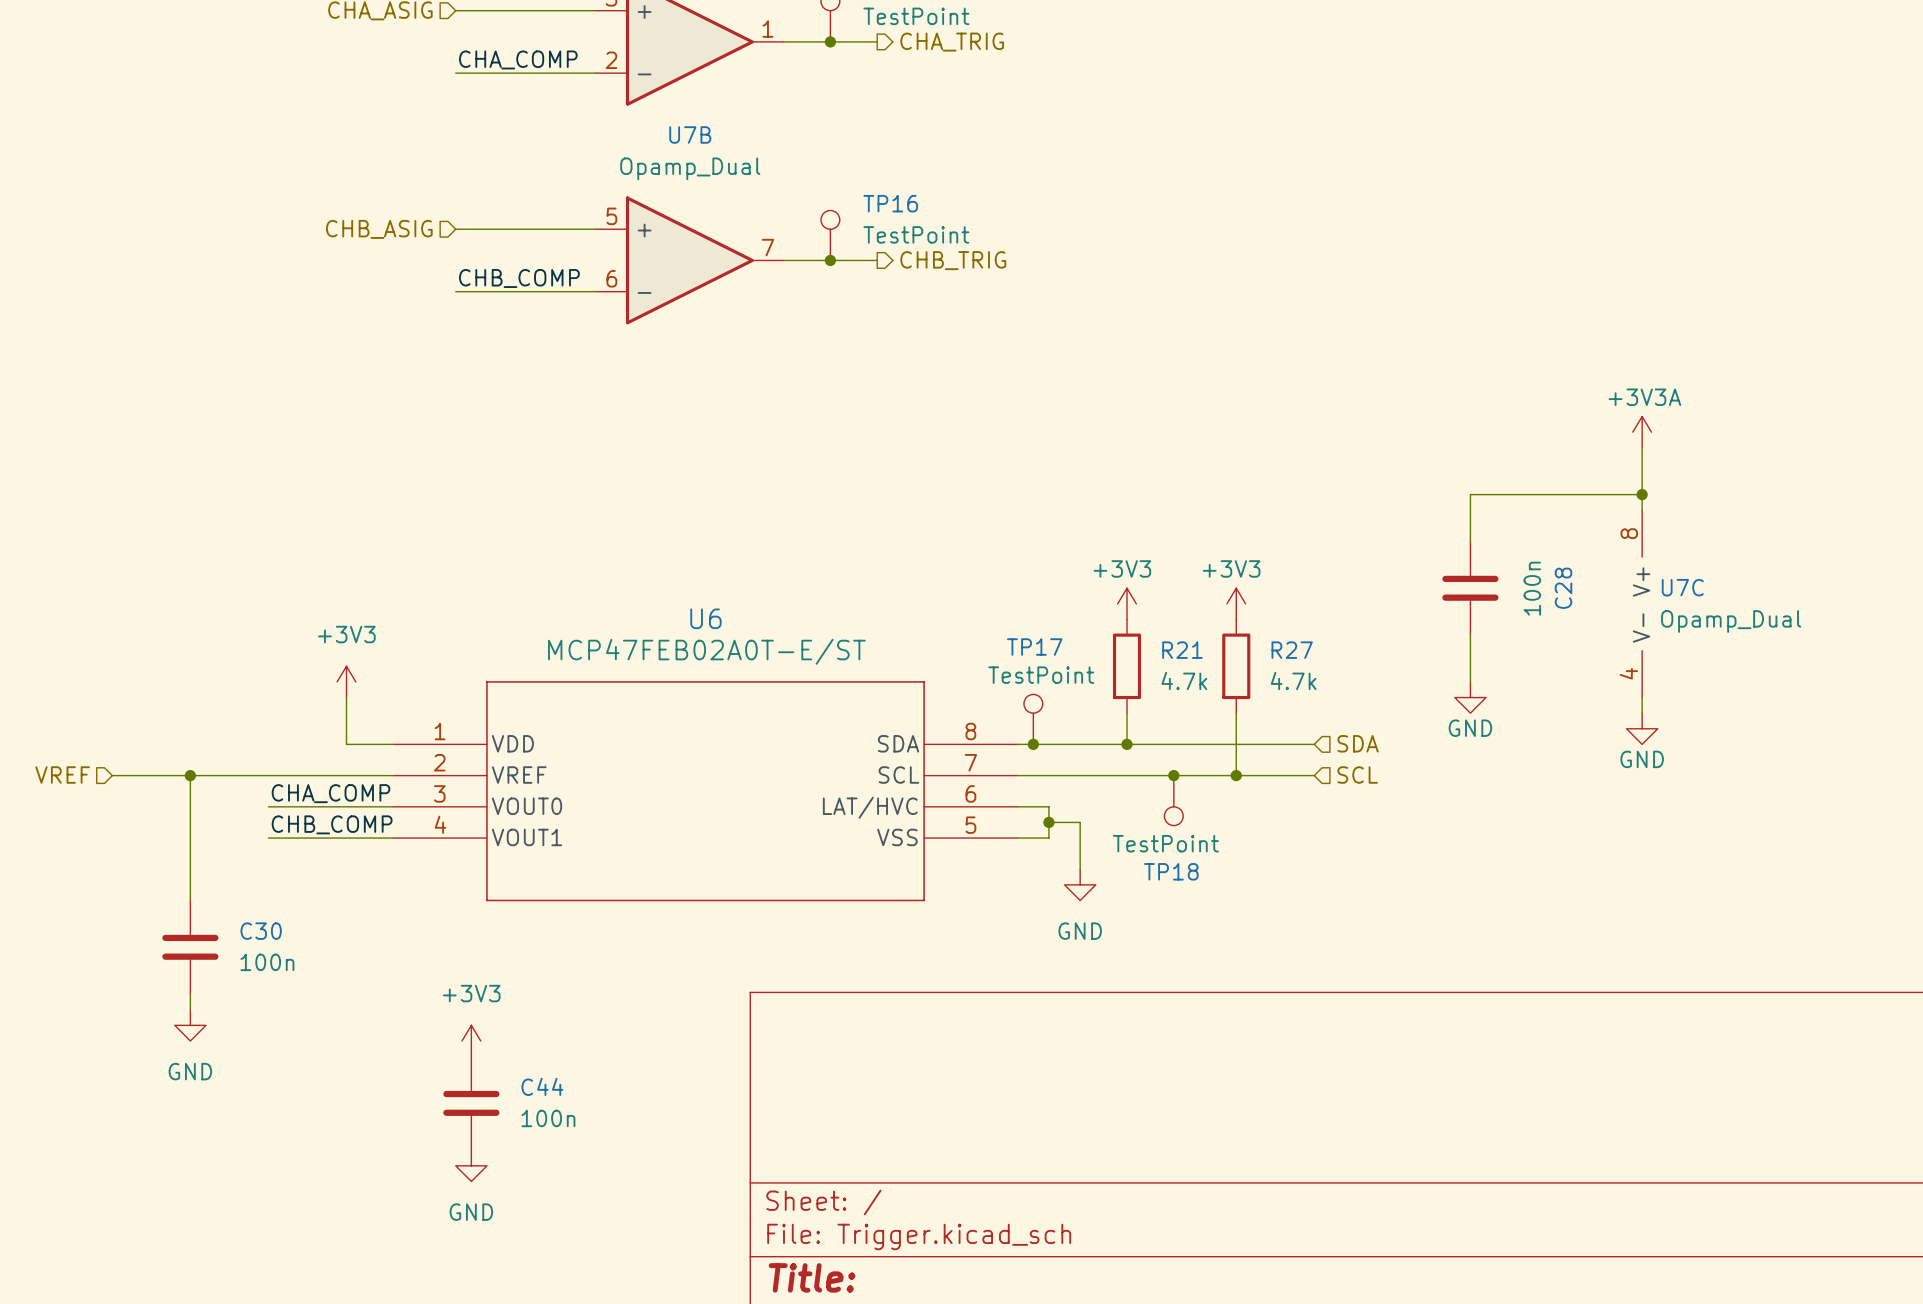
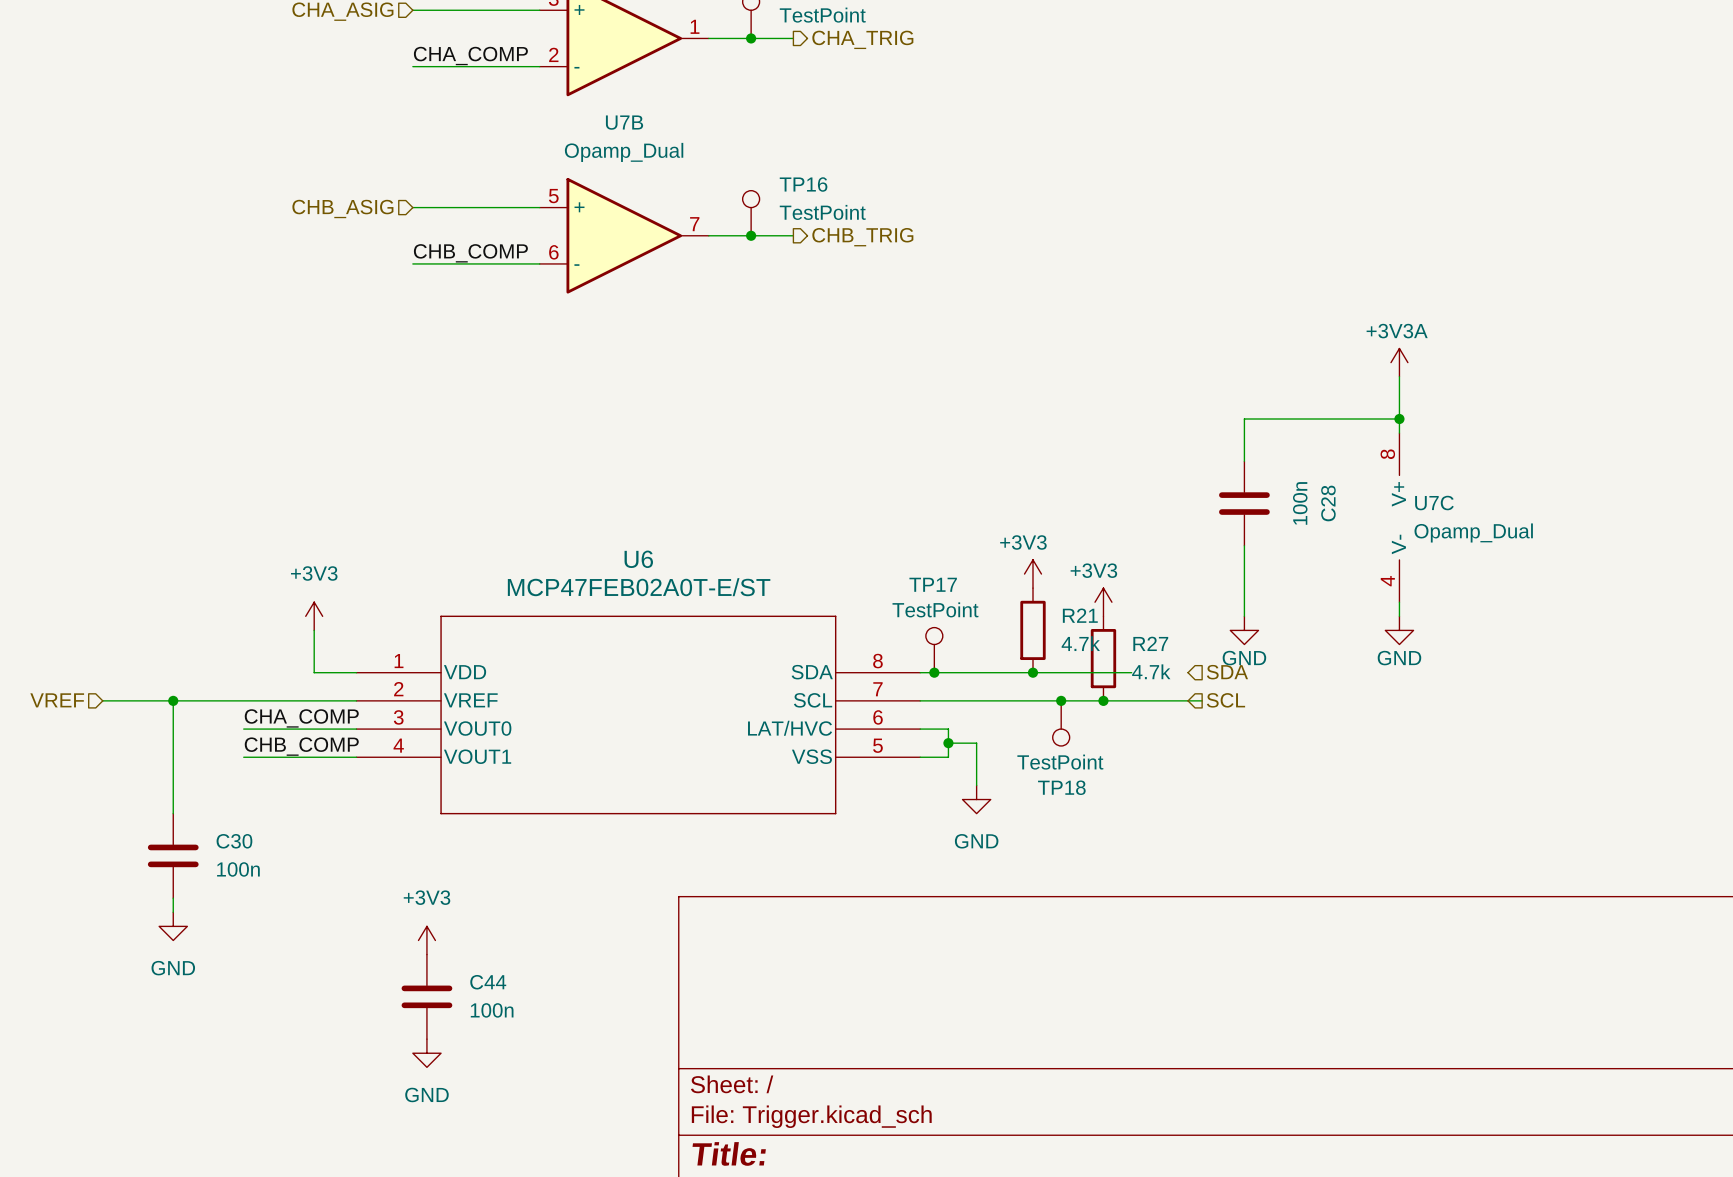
power symbol position: +3V3A (1642, 432) -> +3V3A (1399, 362)
wire: (1642, 447) (1642, 510) -> (1399, 376) (1399, 433)
junction: none -> (1399, 418)
wire: (1642, 494) (1470, 494) (1470, 541) -> (1399, 418) (1244, 418) (1244, 461)
junction: (1642, 494) -> none
C28 position: (1470, 588) -> (1244, 503)
power symbol position: +3V3 (1127, 603) -> +3V3 (1033, 574)
power symbol: +3V3 (1236, 603) -> none
wire: none -> (1244, 545) (1244, 616)
U7C position: (1642, 603) -> (1399, 517)
wire: (1470, 635) (1470, 681) -> none
R21 position: (1127, 666) -> (1033, 630)
power symbol: none -> +3V3 (1103, 602)
R27 position: (1236, 666) -> (1103, 658)
power symbol: none -> GND (1244, 630)
power symbol: GND (1470, 697) -> none
power symbol: none -> GND (1399, 630)
wire: (1642, 697) (1642, 713) -> (1399, 602) (1399, 616)
wire: (1127, 713) (1127, 744) -> none
wire: (1236, 713) (1236, 775) -> none
power symbol: GND (1642, 728) -> none
junction position: (1127, 744) -> (1033, 672)
wire: (1251, 744) (1314, 744) -> none
junction position: (1236, 775) -> (1103, 700)
wire: none -> (1188, 700) (1202, 700)

